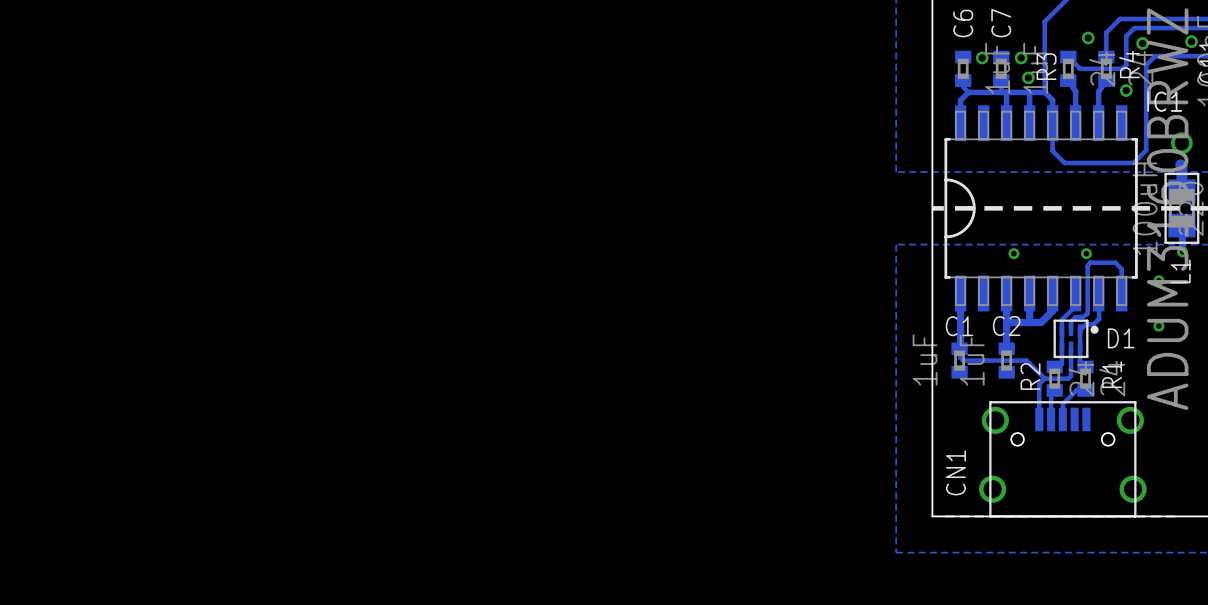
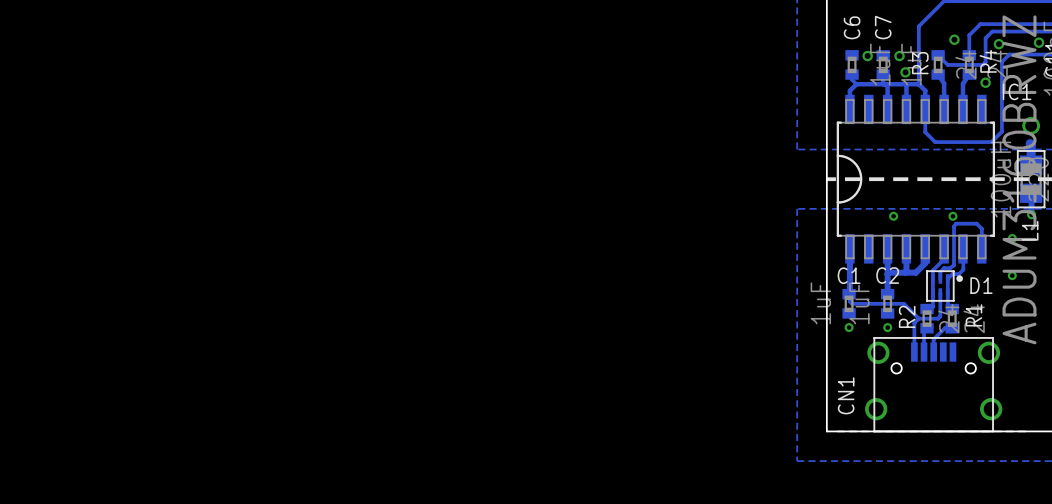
via: none -> (849, 327)
via: none -> (887, 327)

